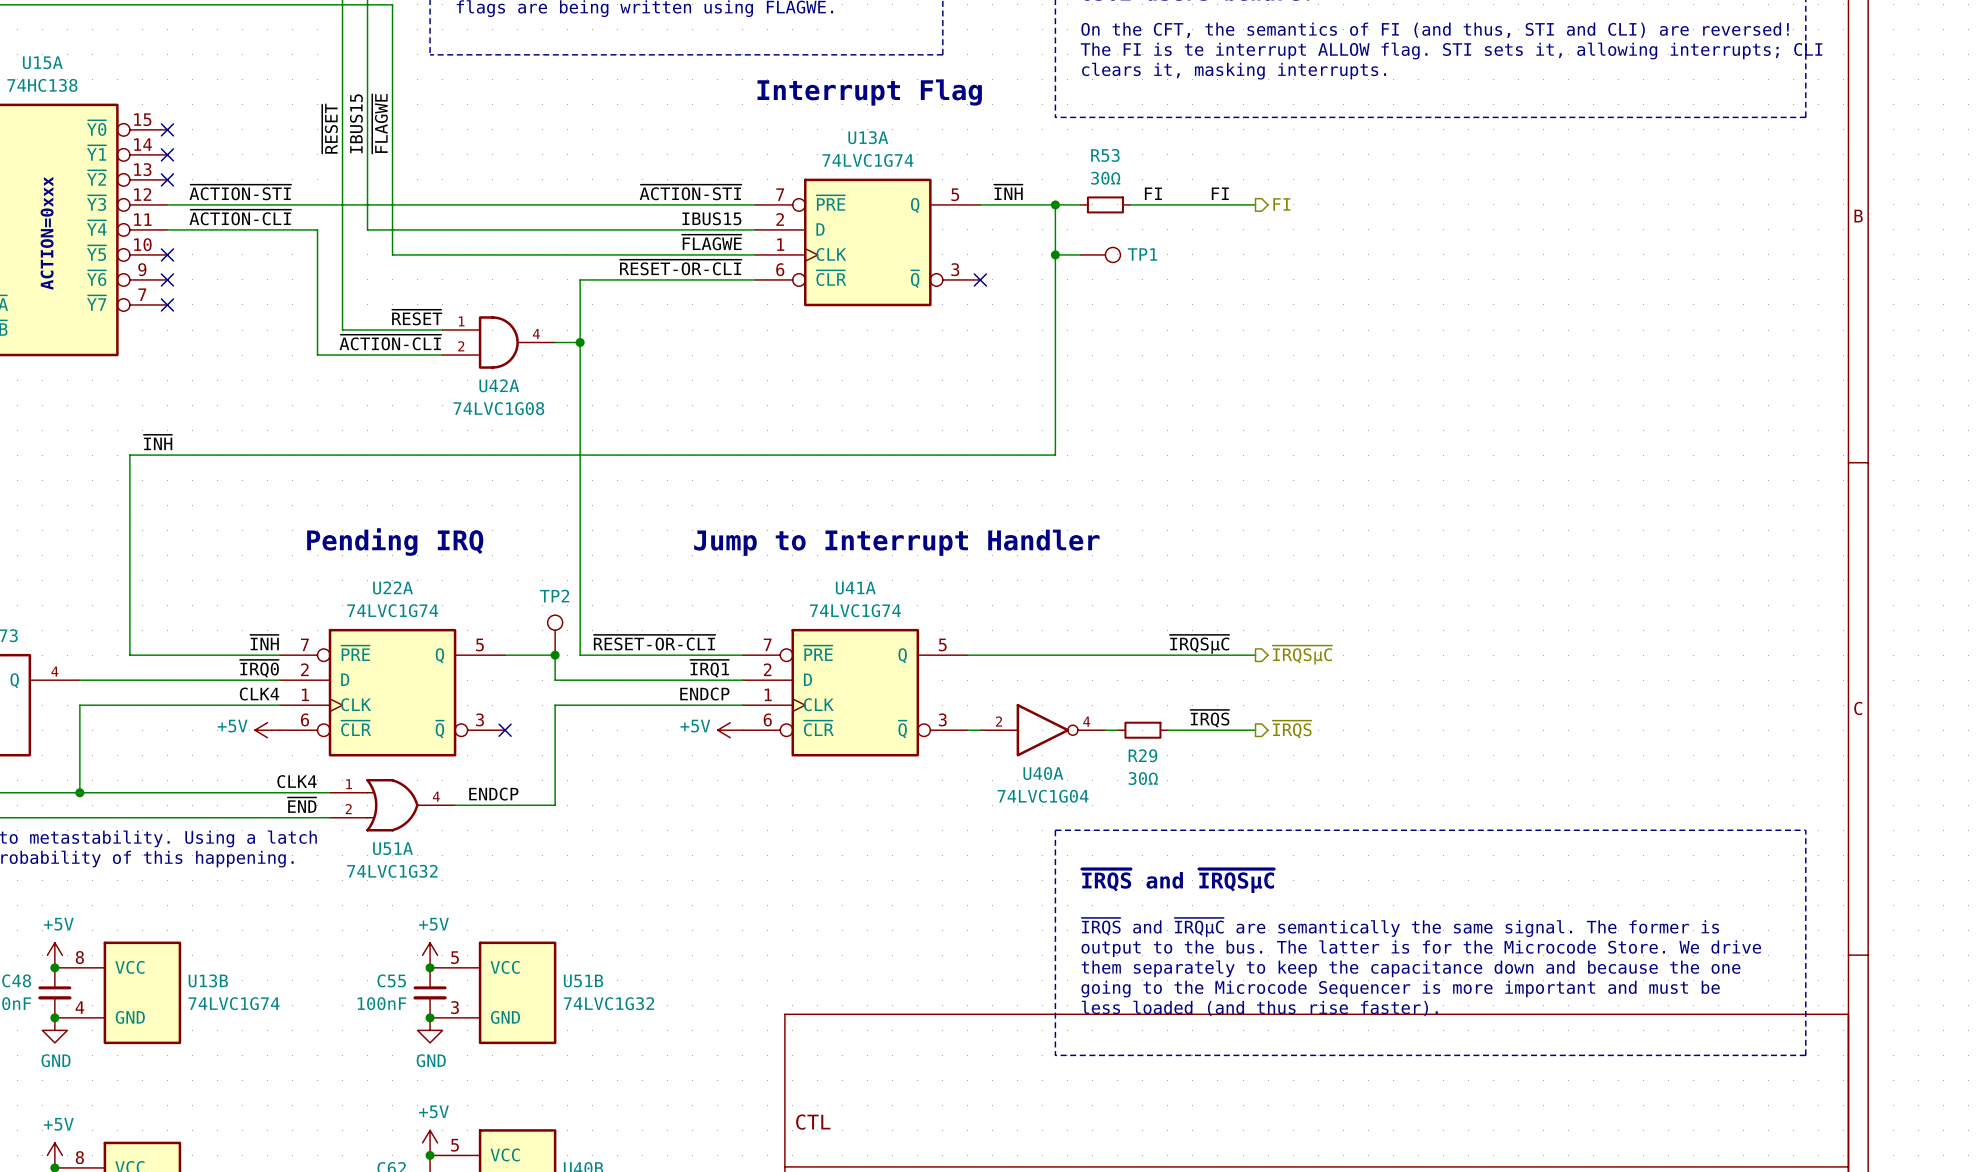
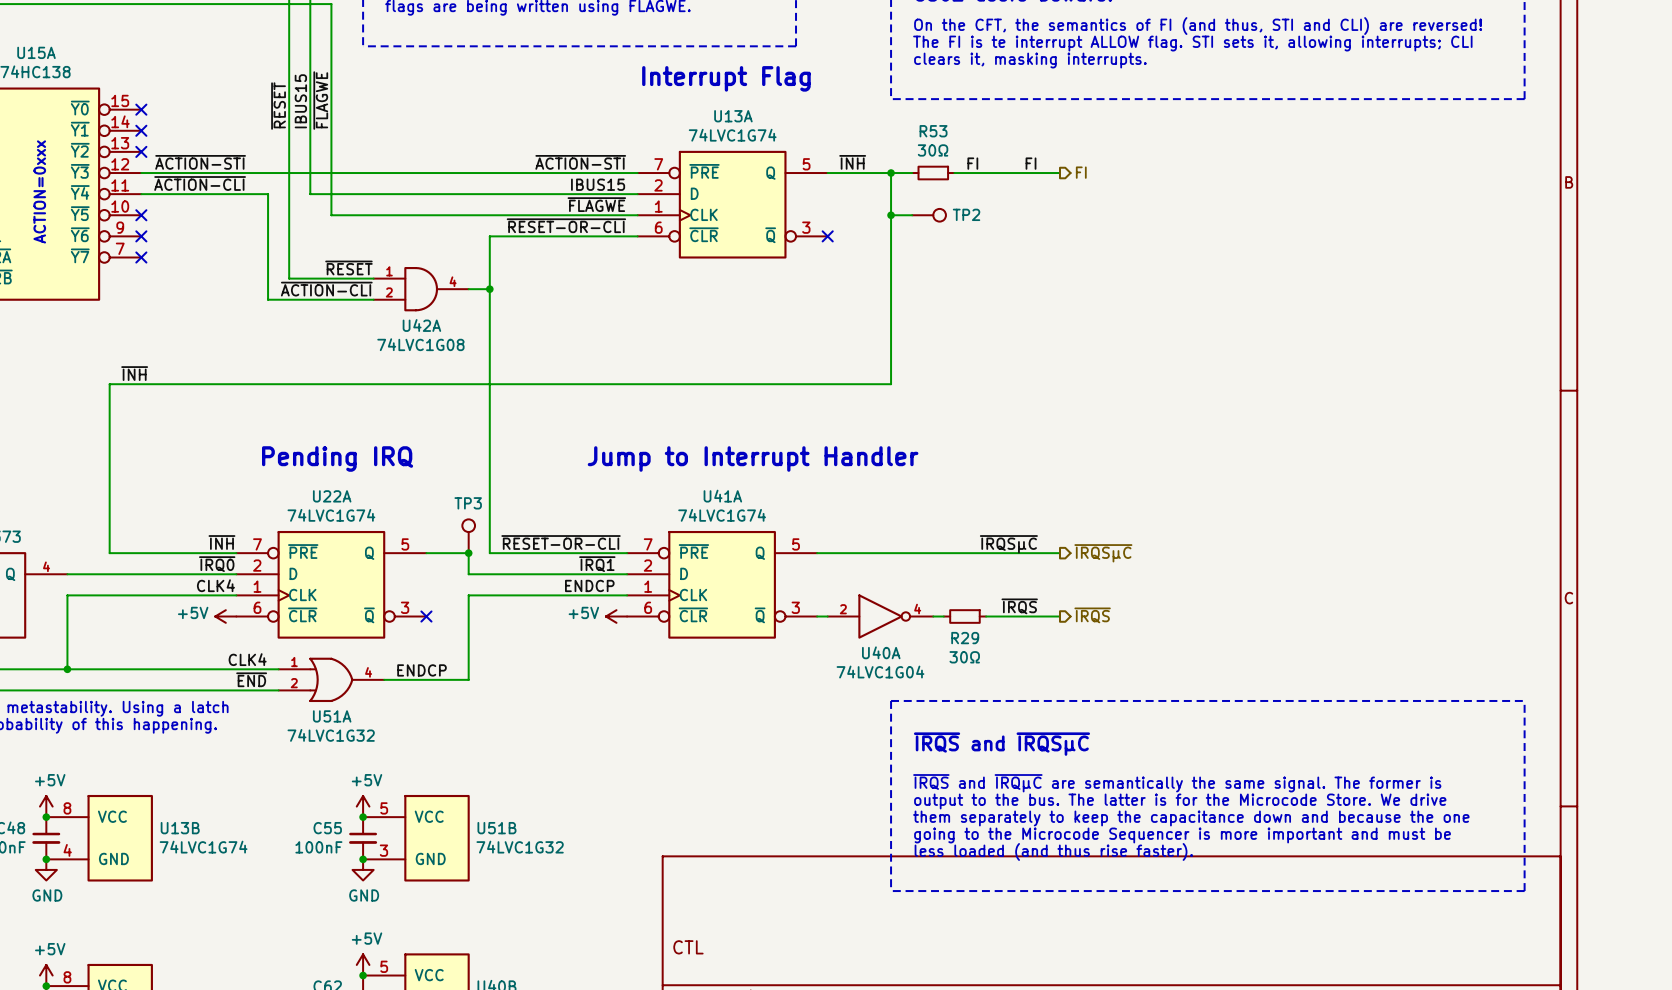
TP1 name: TP1 (1142, 254) -> TP2 (966, 214)
TP2 name: TP2 (554, 596) -> TP3 (468, 503)

